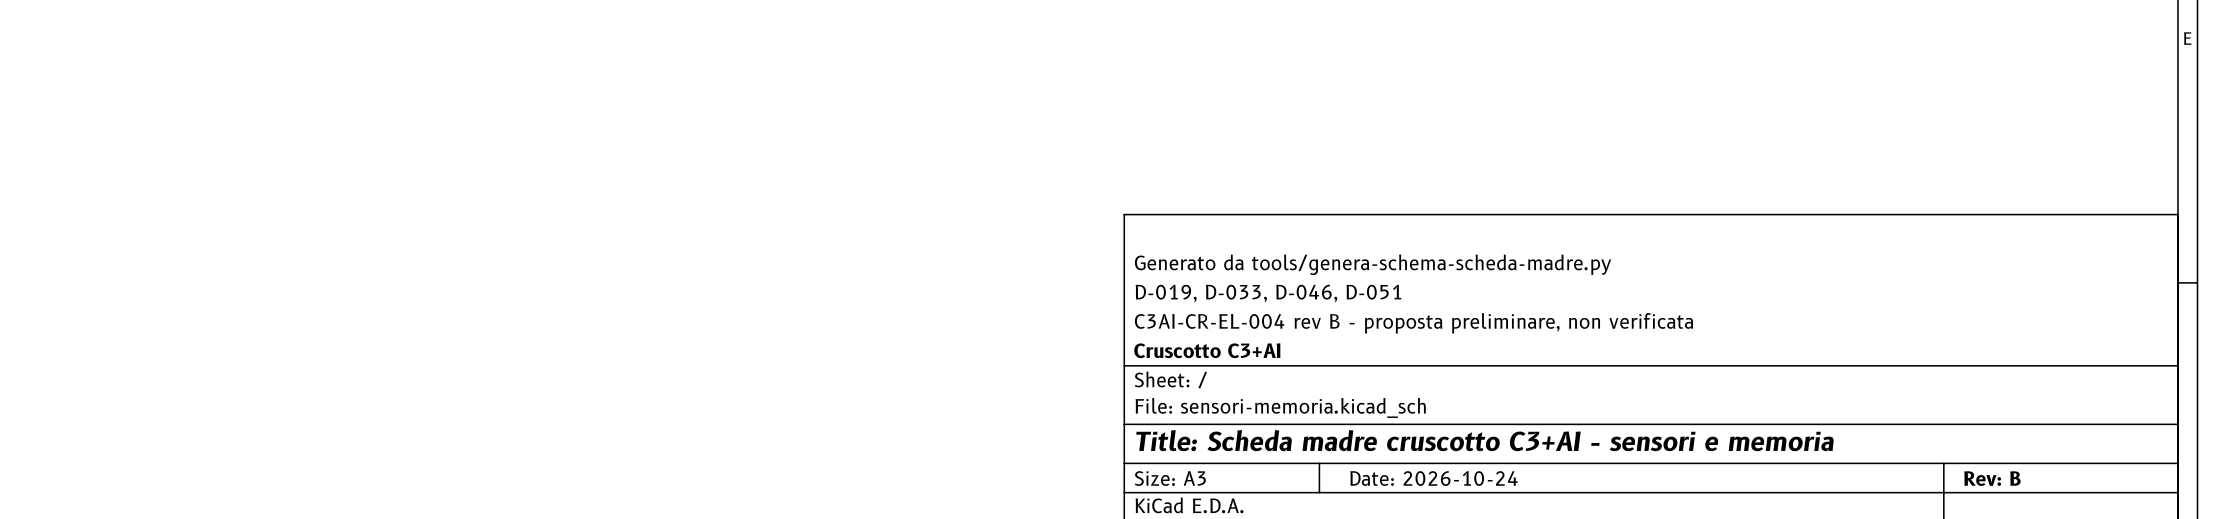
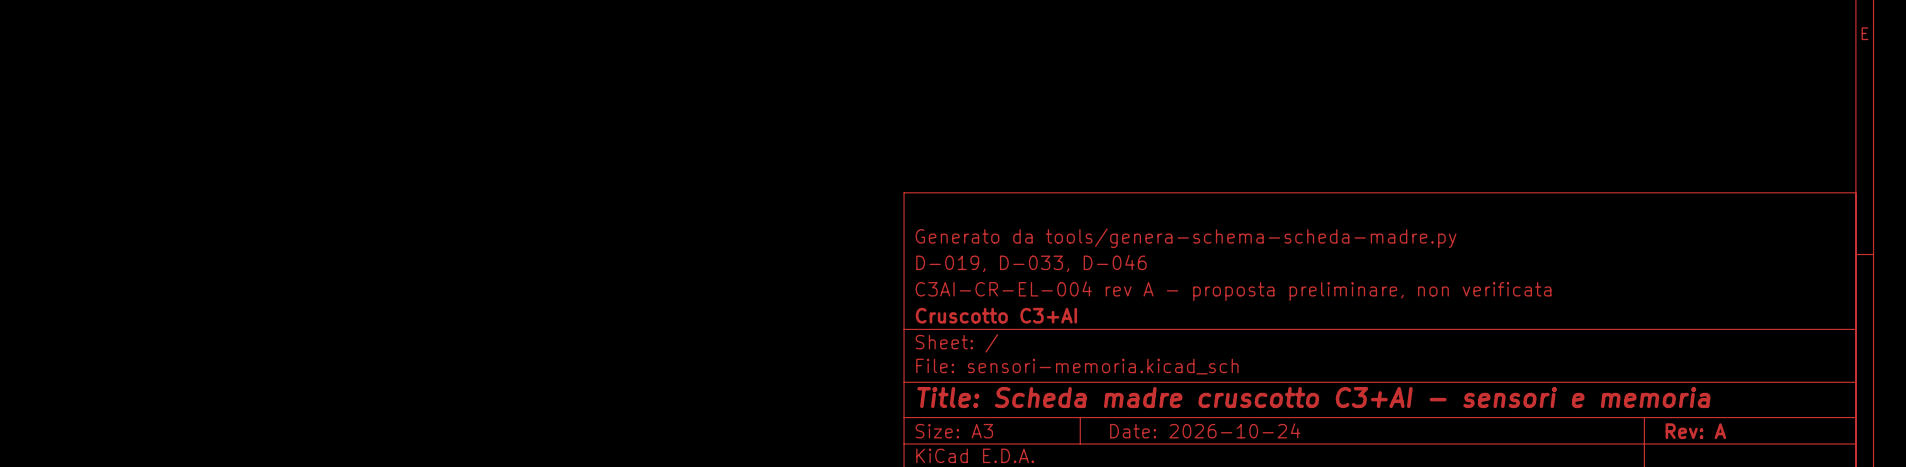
title block: D-019, D-033, D-046, D-051 (1268, 293) -> D-019, D-033, D-046 (1031, 263)
title block: C3AI-CR-EL-004 rev B - proposta preliminare, non verificata (1414, 323) -> C3AI-CR-EL-004 rev A - proposta preliminare, non verificata (1233, 291)
title block: Rev: B (1992, 478) -> Rev: A (1695, 431)

